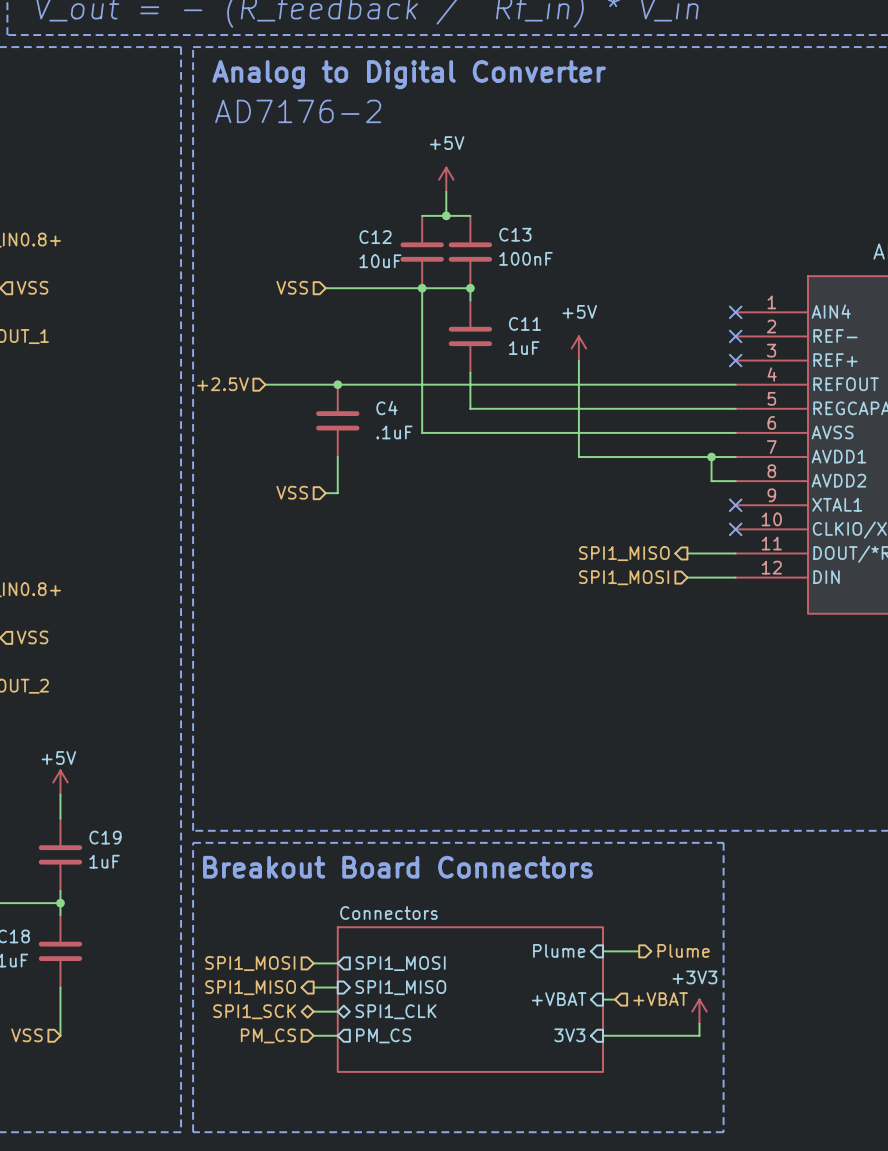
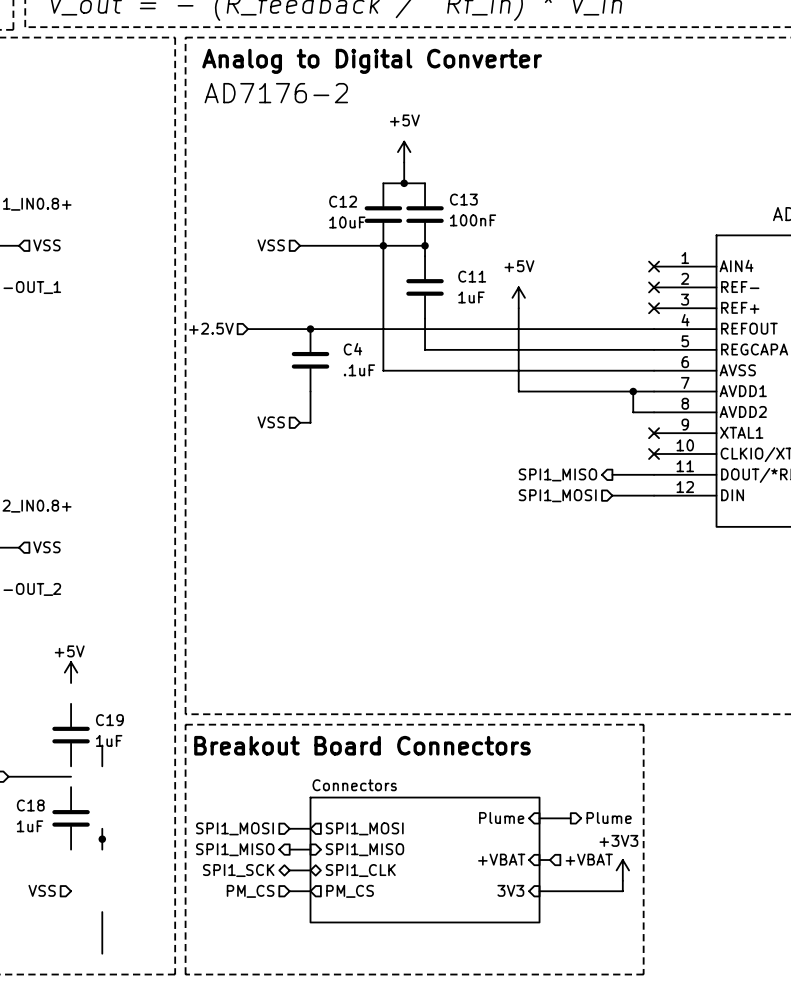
wire: (60, 794) (60, 818) -> (102, 745) (102, 766)
wire: (60, 891) (60, 915) -> (102, 828) (102, 849)
junction: (60, 903) -> none
junction: none -> (102, 839)
wire: (60, 987) (60, 1035) -> (102, 912) (102, 953)

